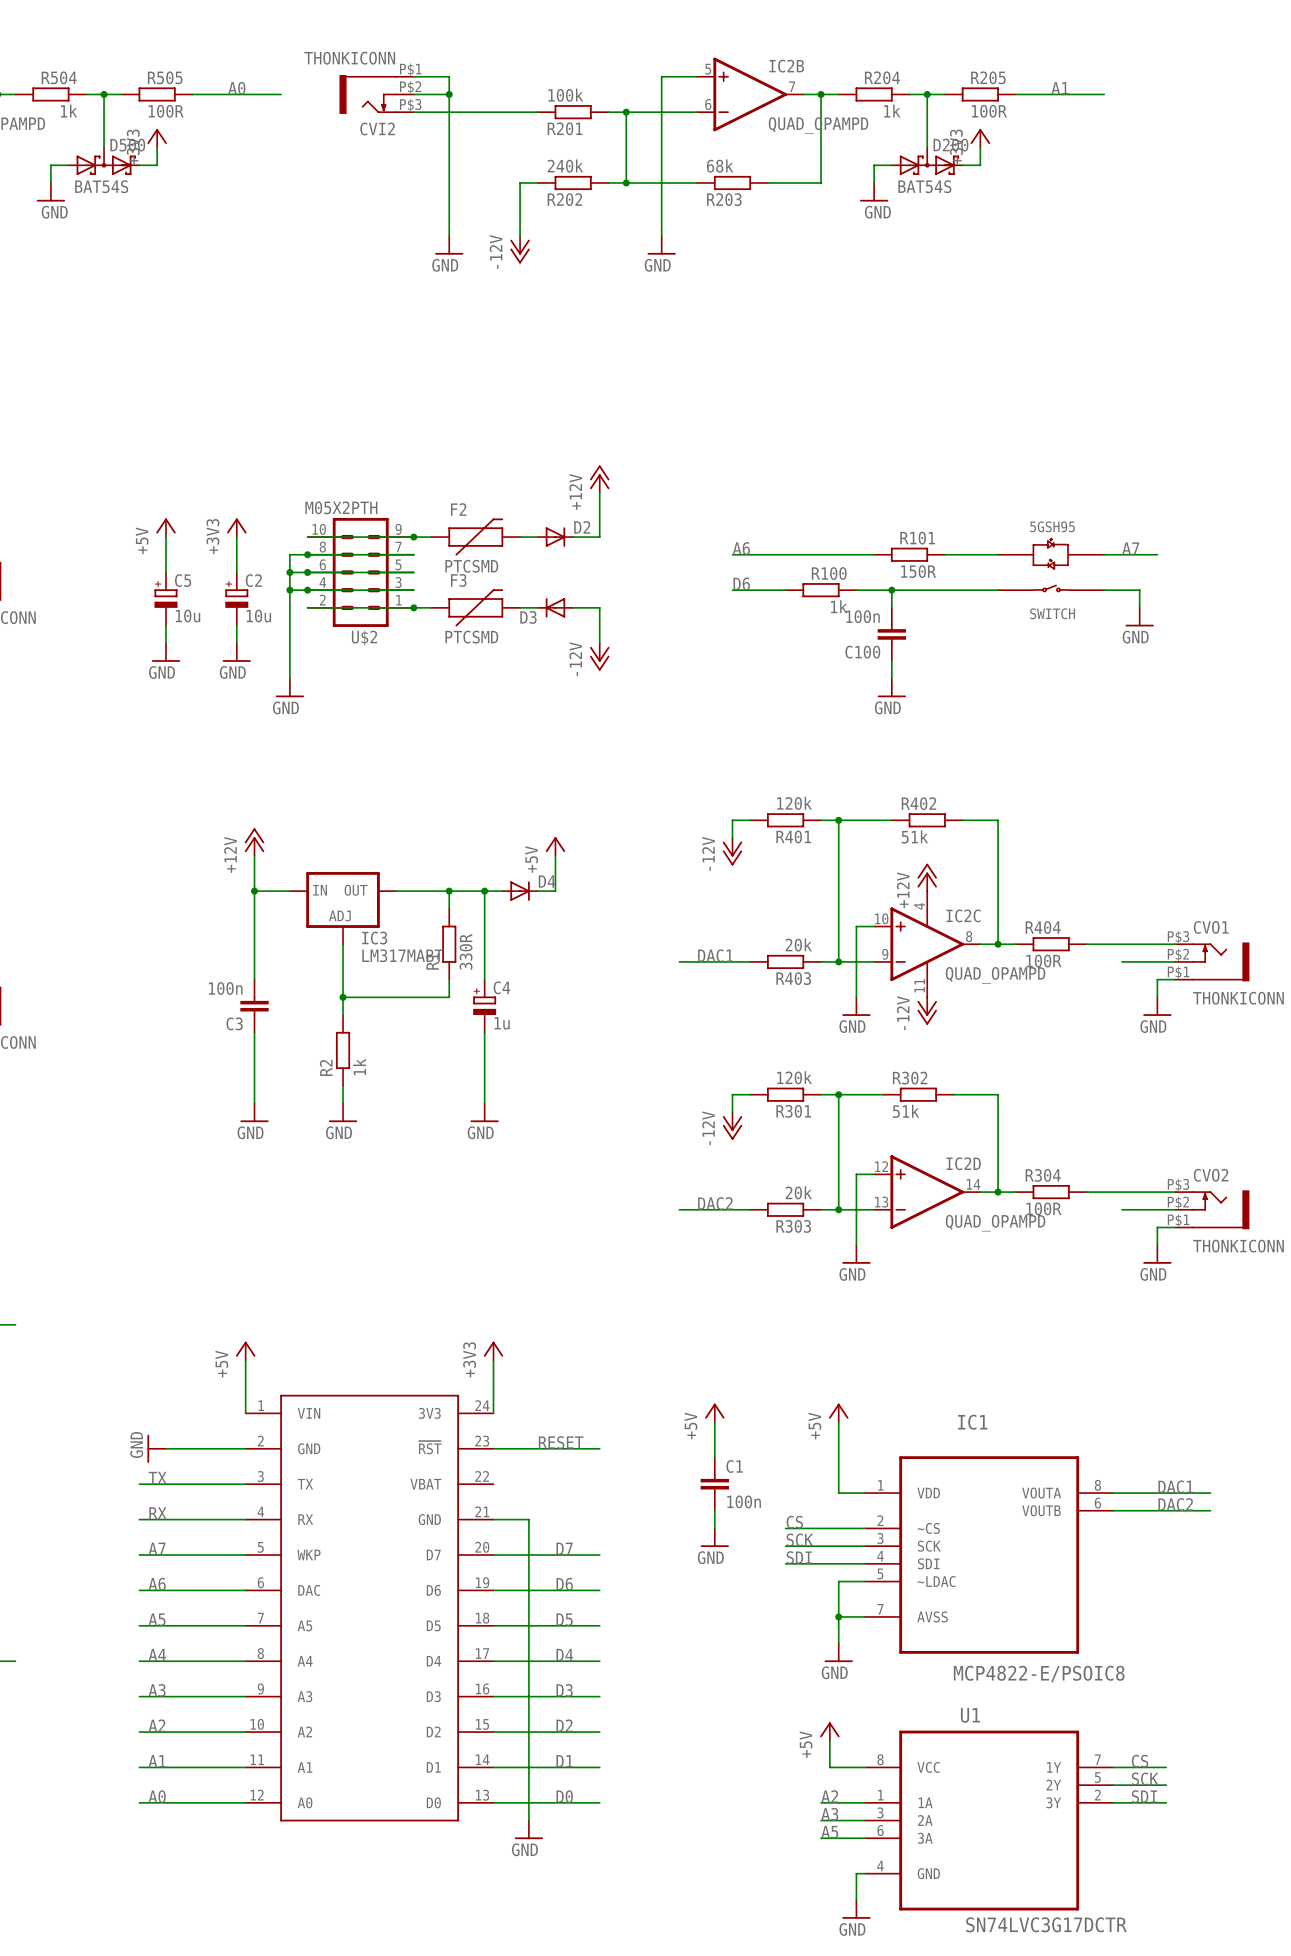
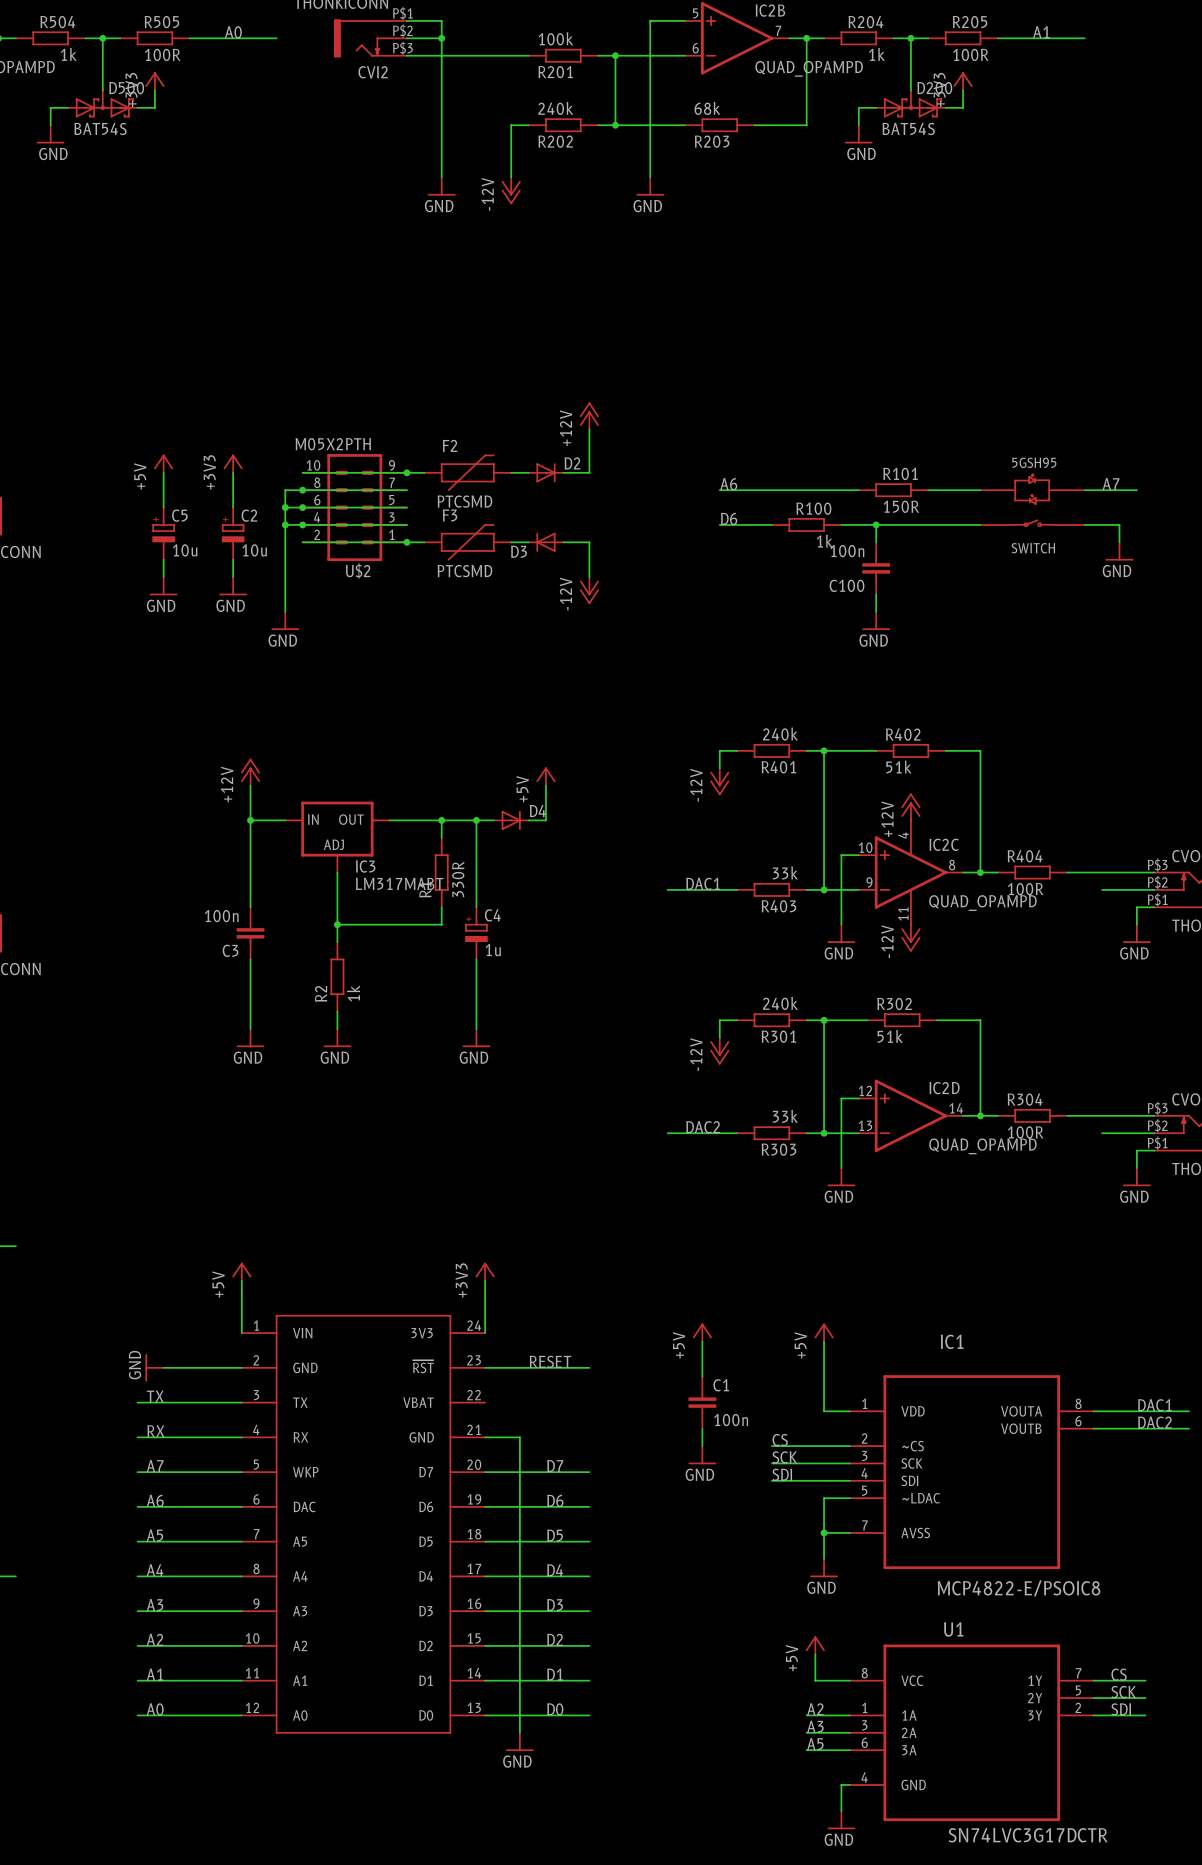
R401 value: 120k (794, 803) -> 240k (780, 734)
R403 value: 20k (798, 944) -> 33k (785, 873)
R301 value: 120k (794, 1077) -> 240k (780, 1003)
R303 value: 20k (798, 1192) -> 33k (785, 1116)

